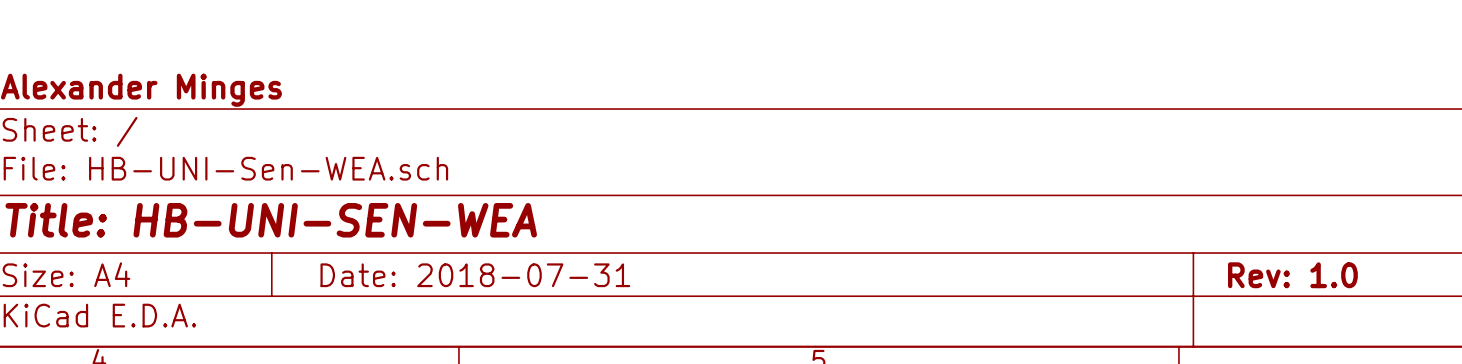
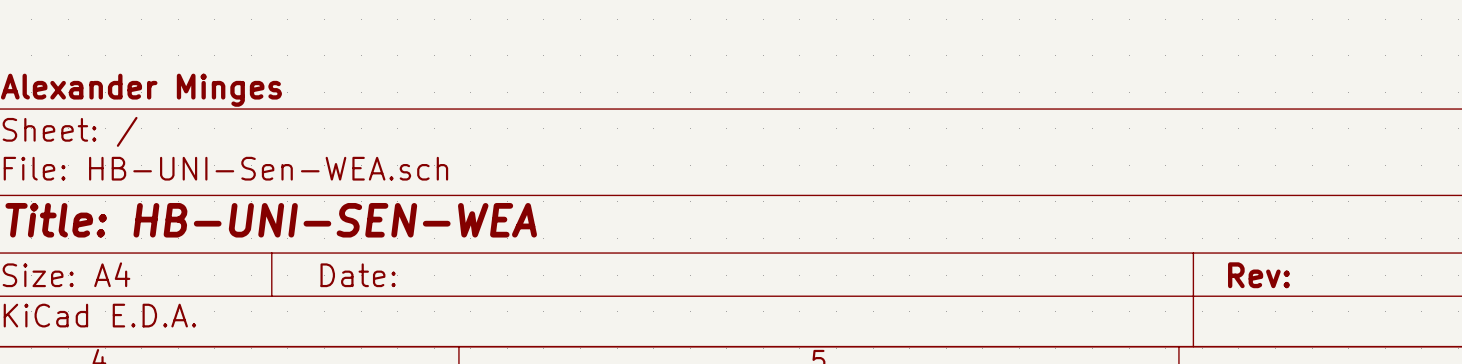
title block: Date: 2018-07-31 (475, 275) -> Date: (358, 275)
title block: Rev: 1.0 (1292, 275) -> Rev: (1258, 275)

